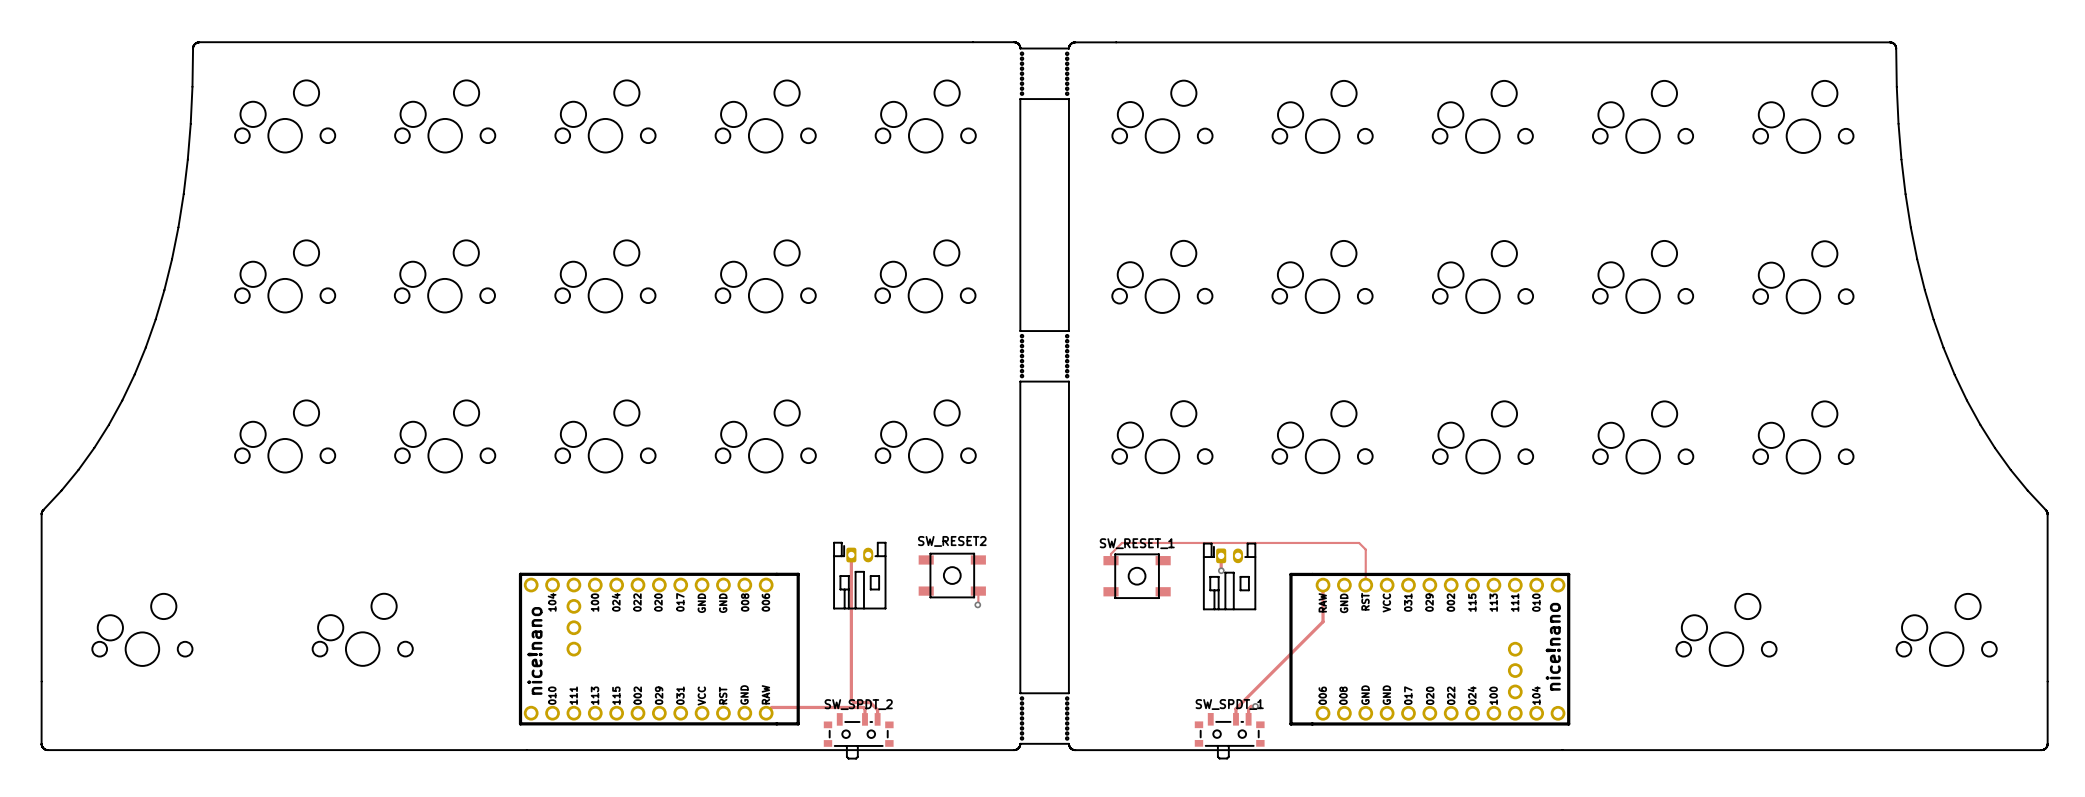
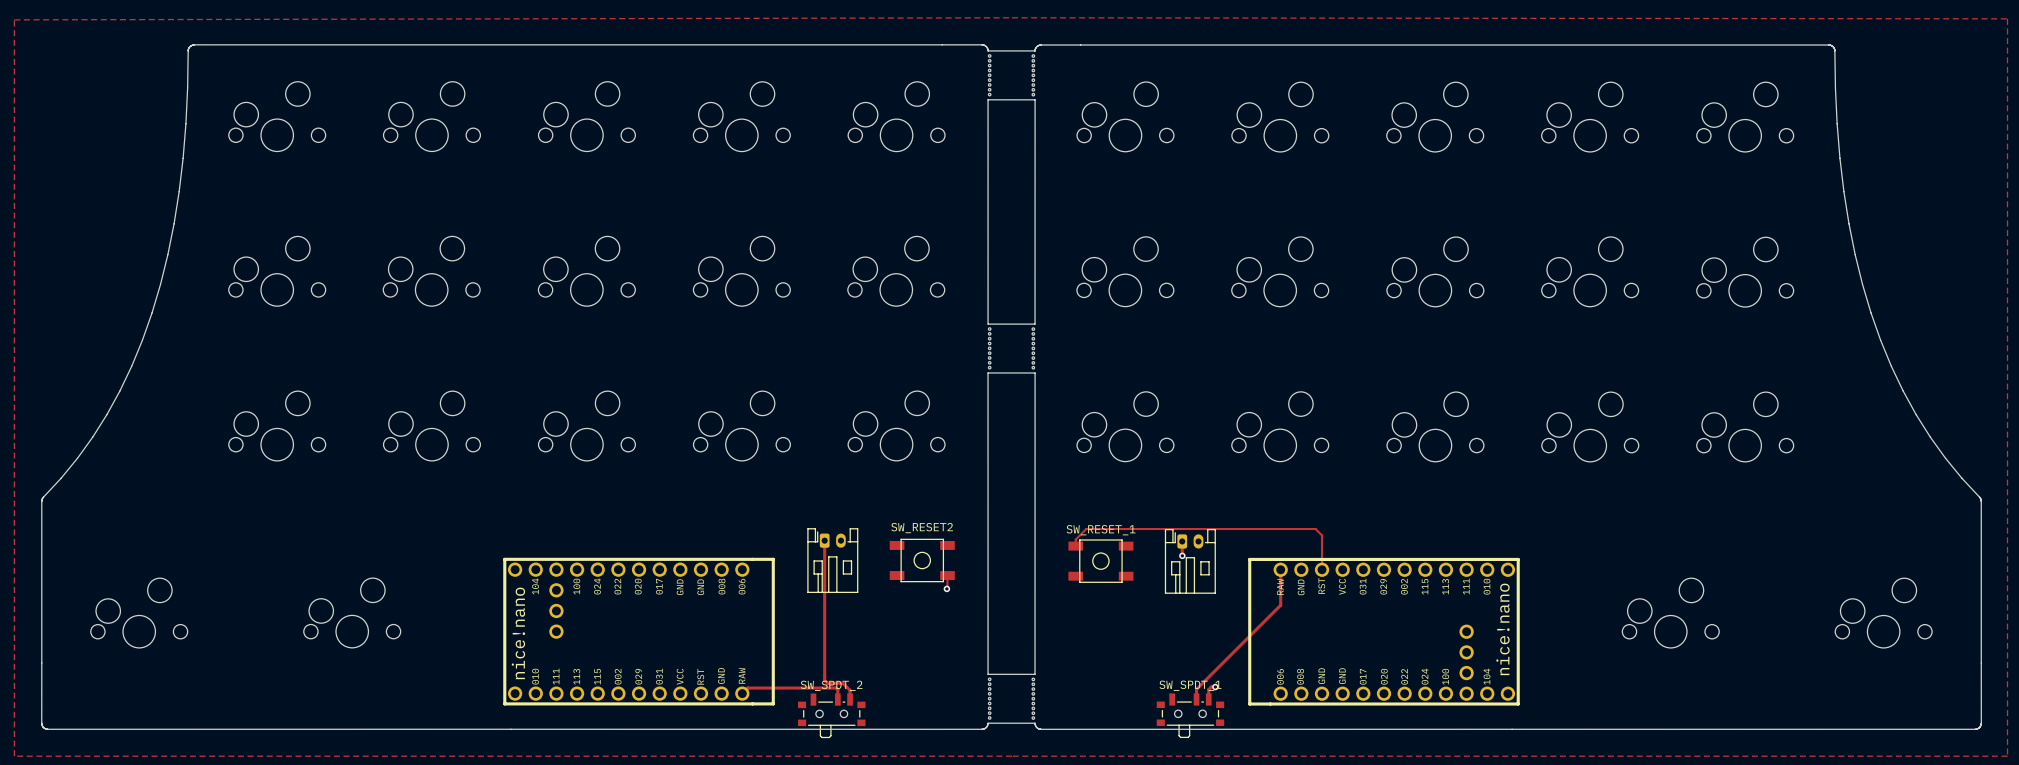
zone outline: none -> (1011, 17) (14, 19) (14, 756) (2007, 756) (2007, 18) (1011, 17)

